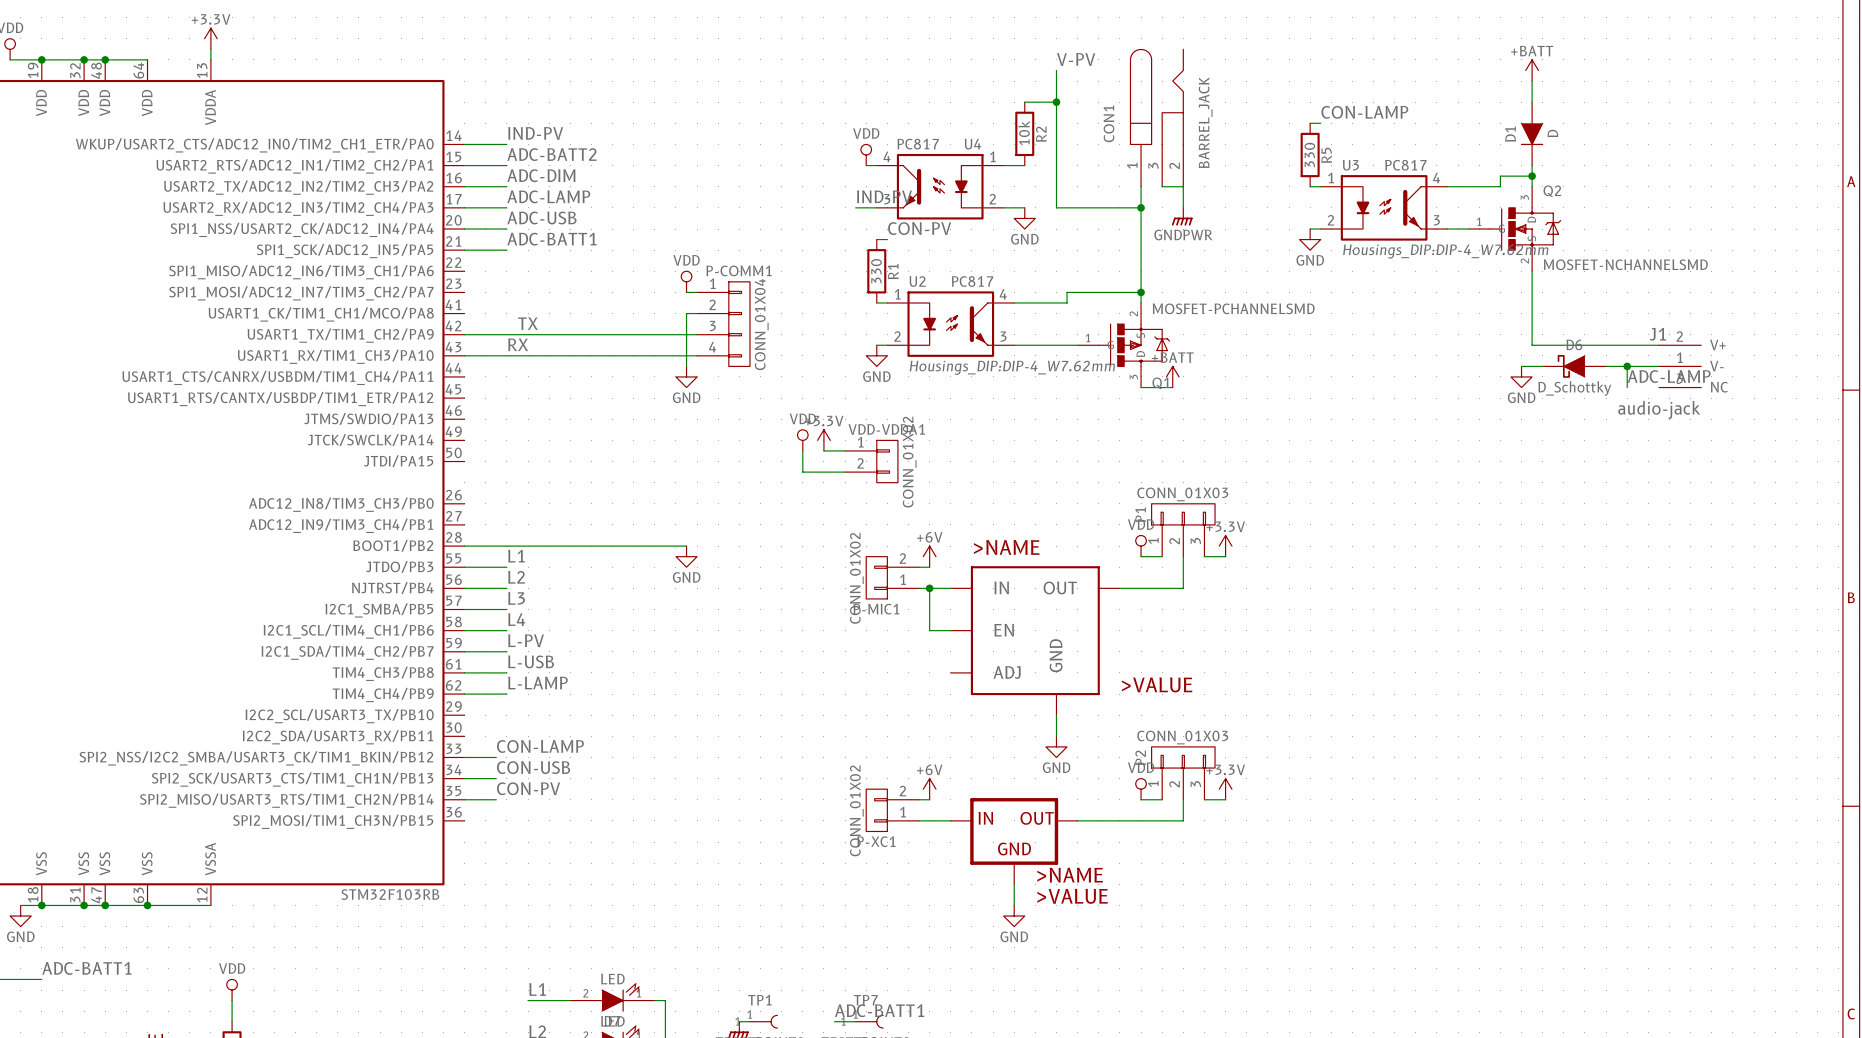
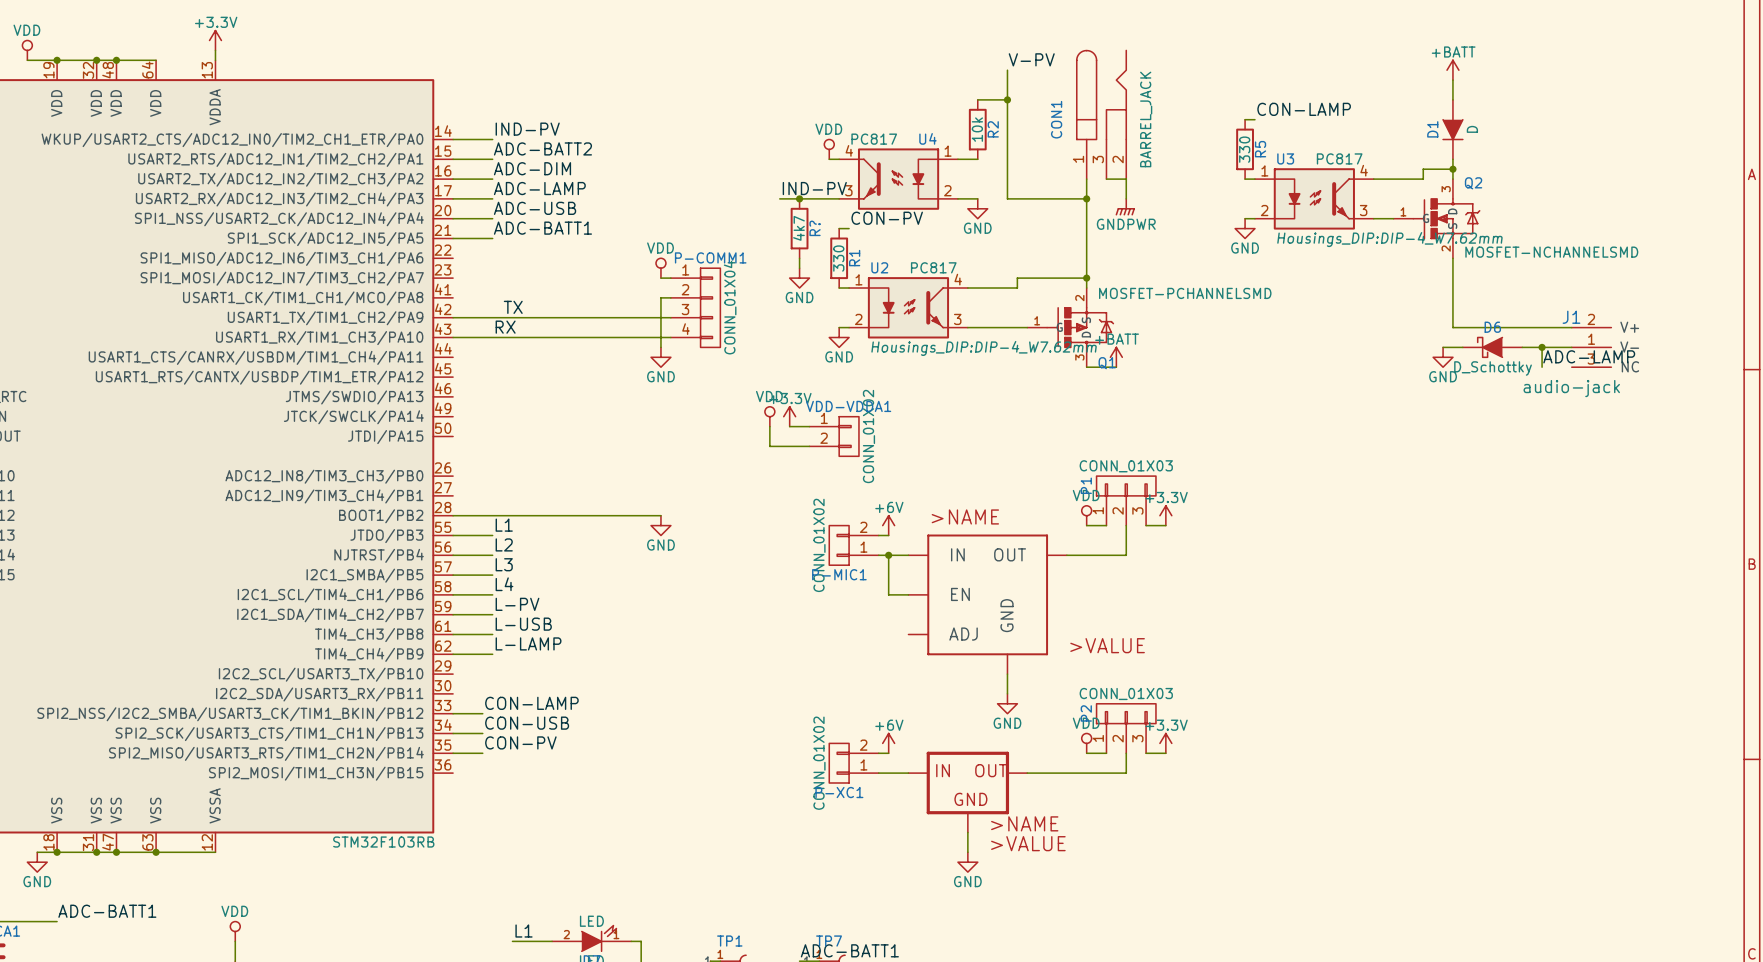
label position: IND-PV (884, 196) -> IND-PV (814, 188)
wire: none -> (779, 198) (819, 198)
junction: none -> (799, 198)
R?: none -> 4k7 (799, 228)
wire: none -> (799, 258) (799, 268)
power symbol: none -> GND (799, 278)

